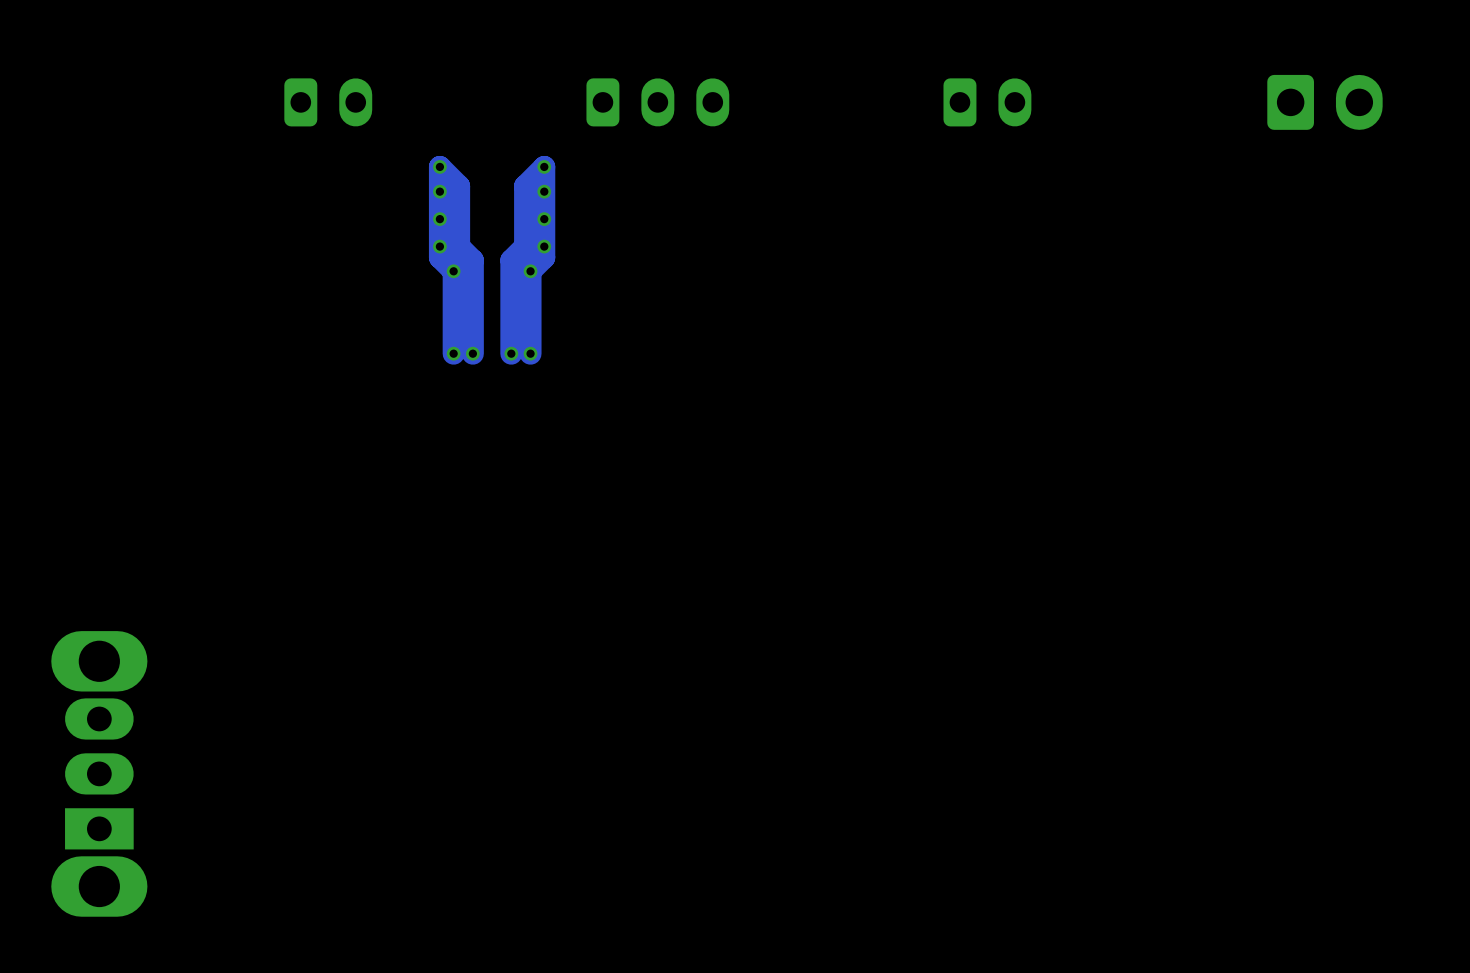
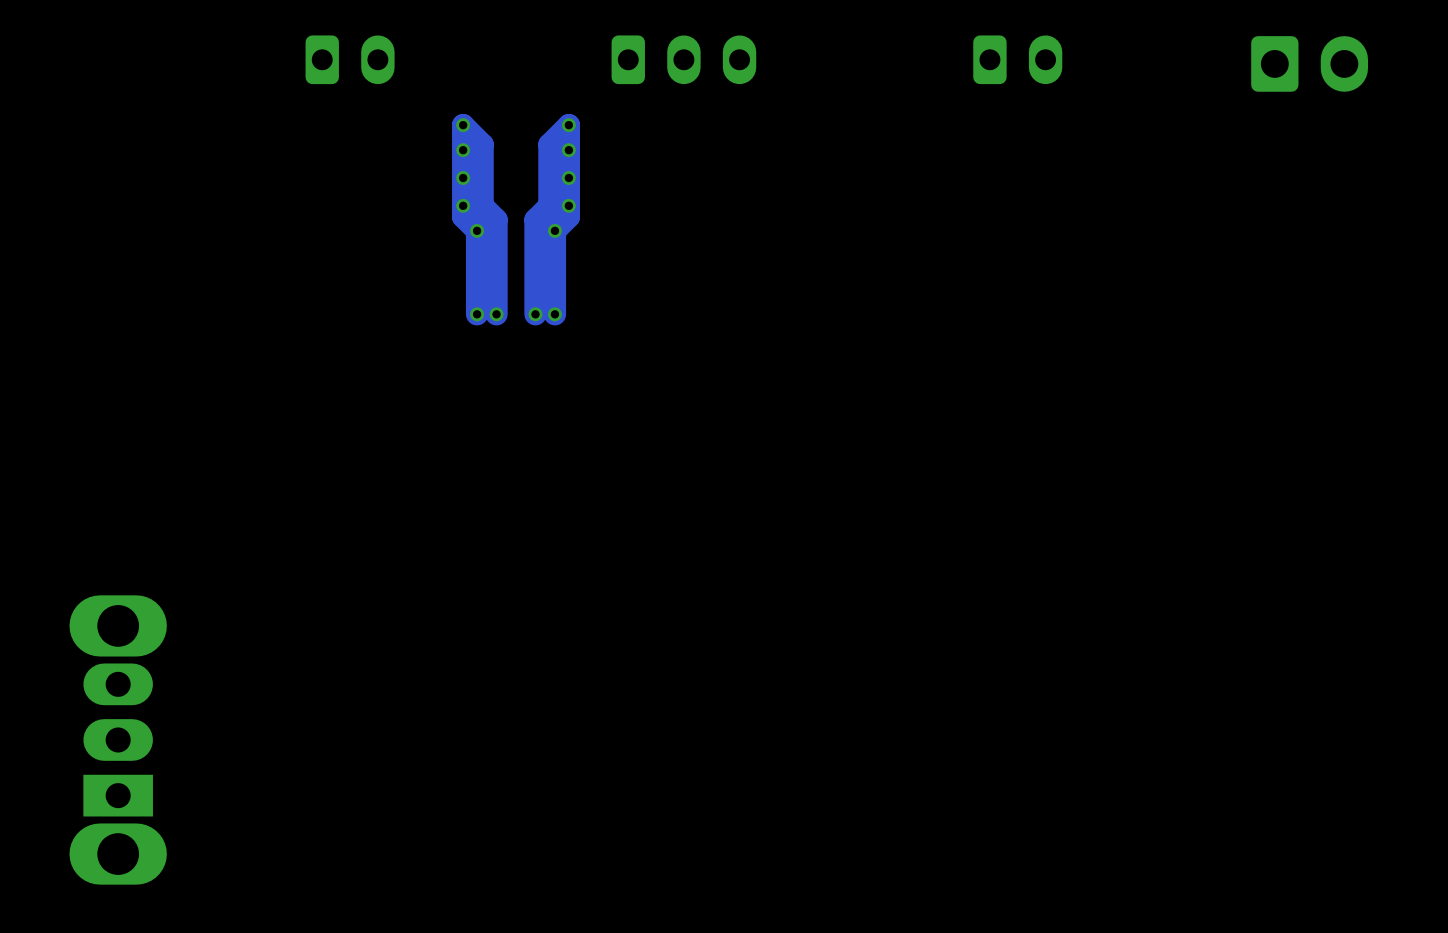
part position: (1324, 102) -> (1309, 63)

